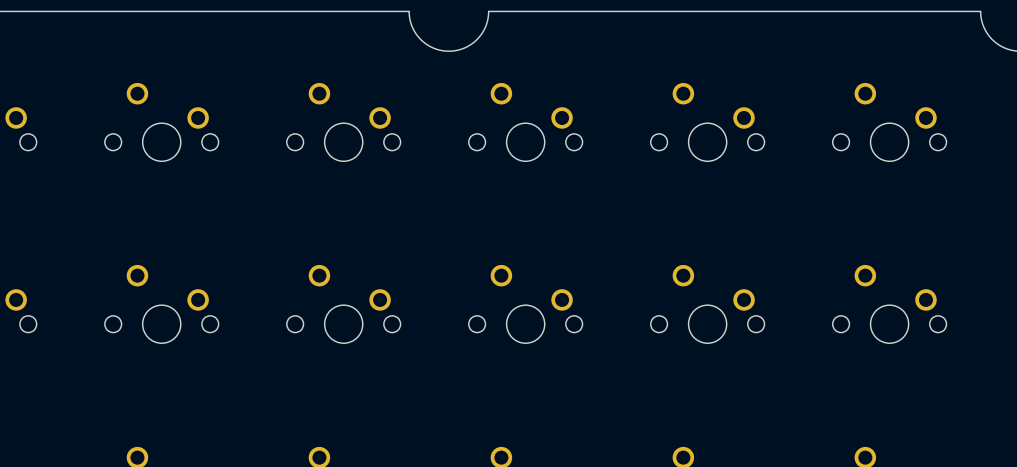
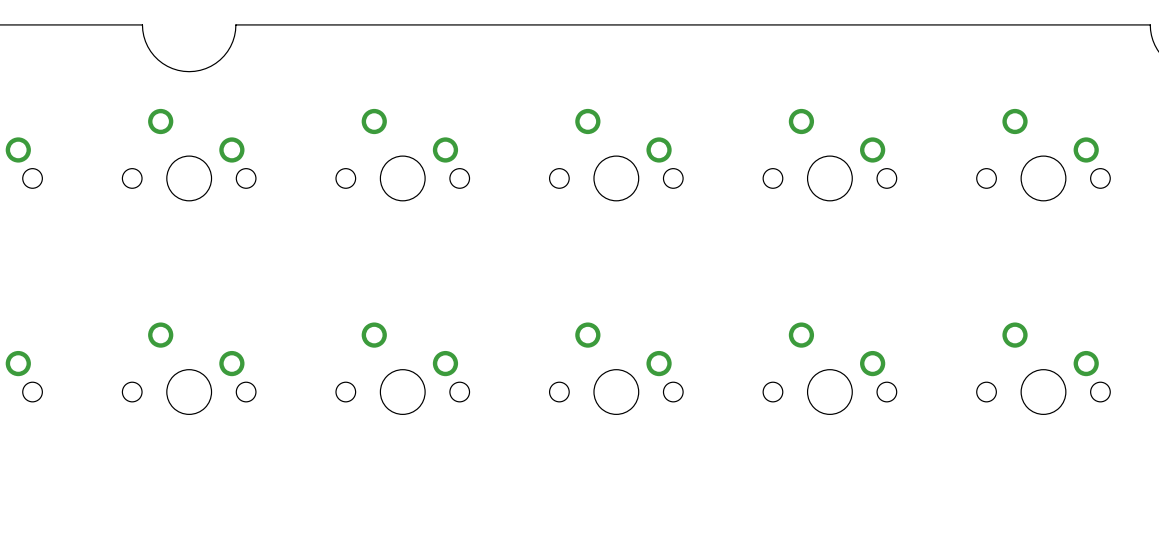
board edge: (201, 11) (121, 11) -> (235, 24) (232, 41) (224, 55) (210, 66) (189, 71) (172, 68) (158, 59) (147, 46) (142, 24)
board edge: (488, 11) (486, 25) (478, 37) (467, 46) (448, 51) (434, 48) (422, 41) (413, 29) (409, 11) -> (572, 24) (479, 24)

